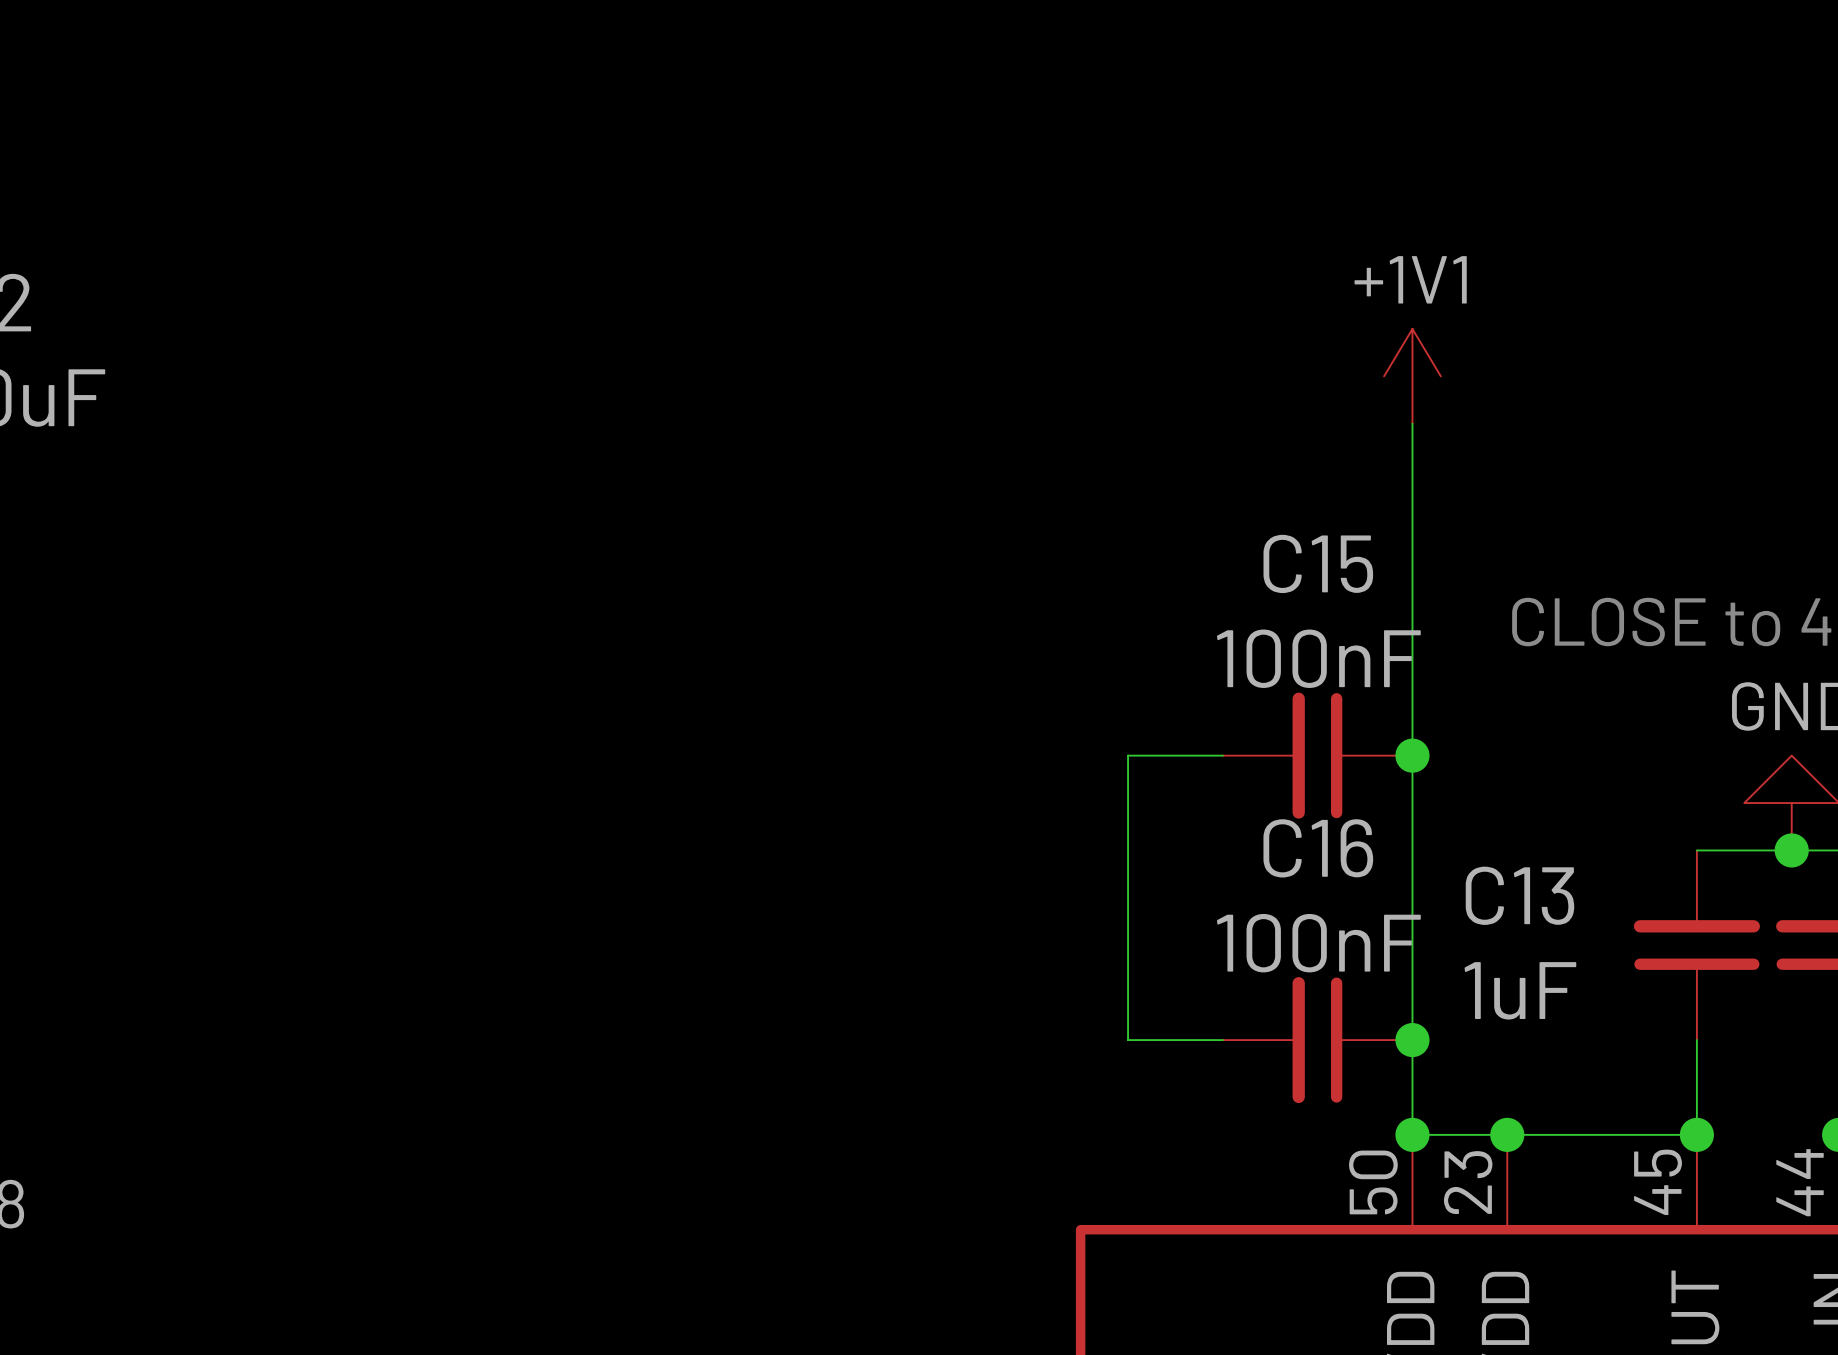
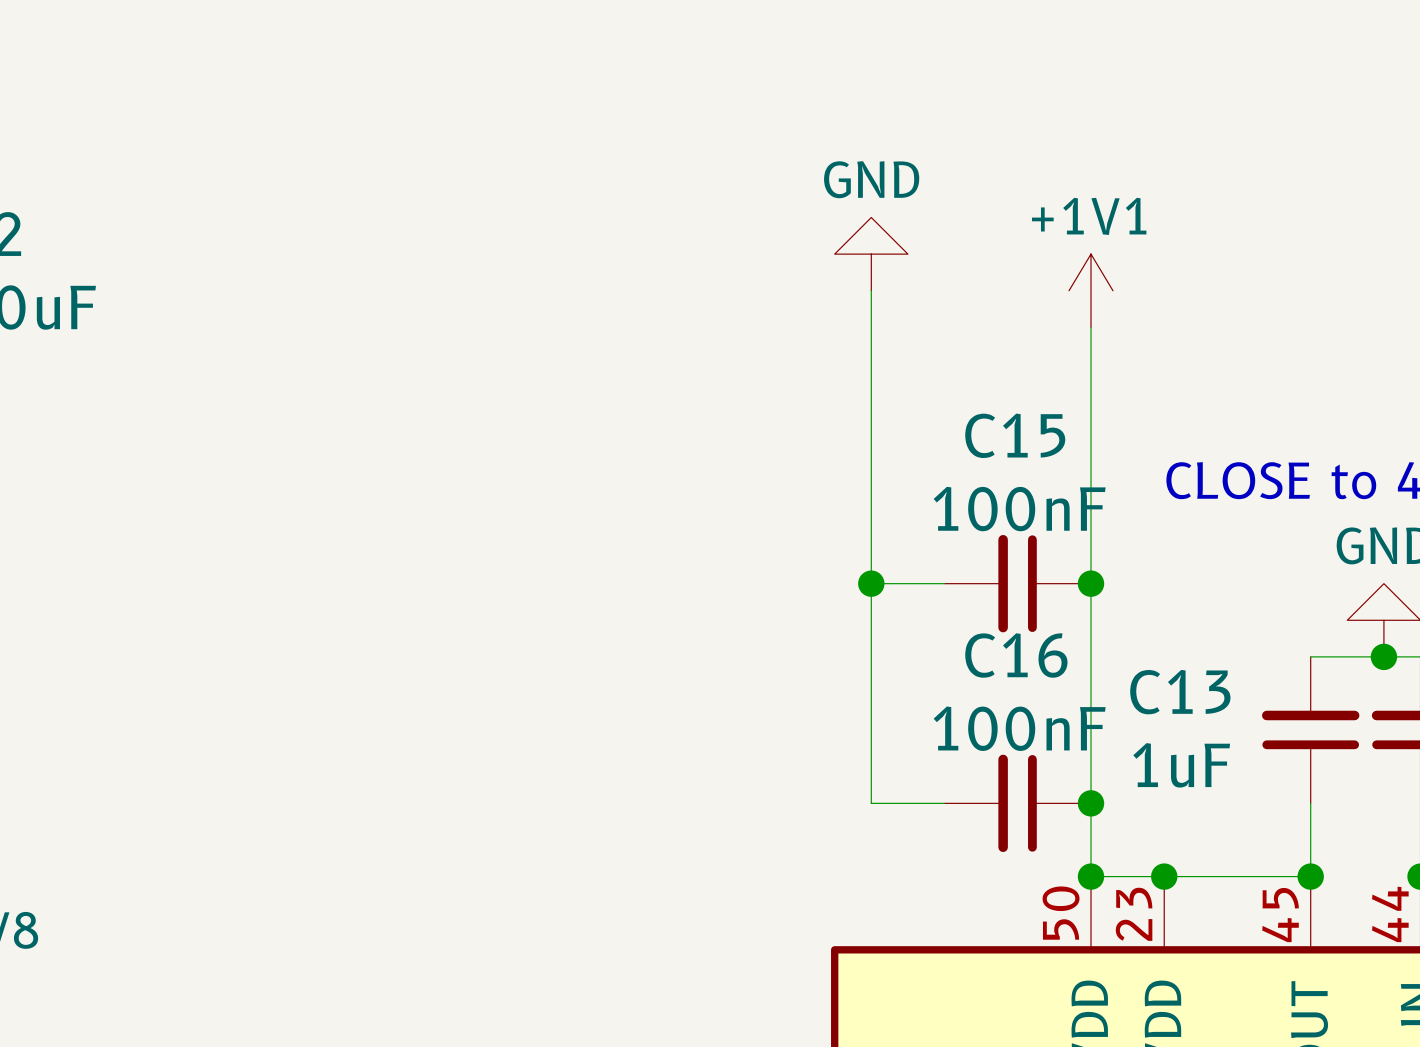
power symbol: none -> GND (871, 254)
wire: none -> (871, 290) (871, 583)
junction: none -> (871, 583)

